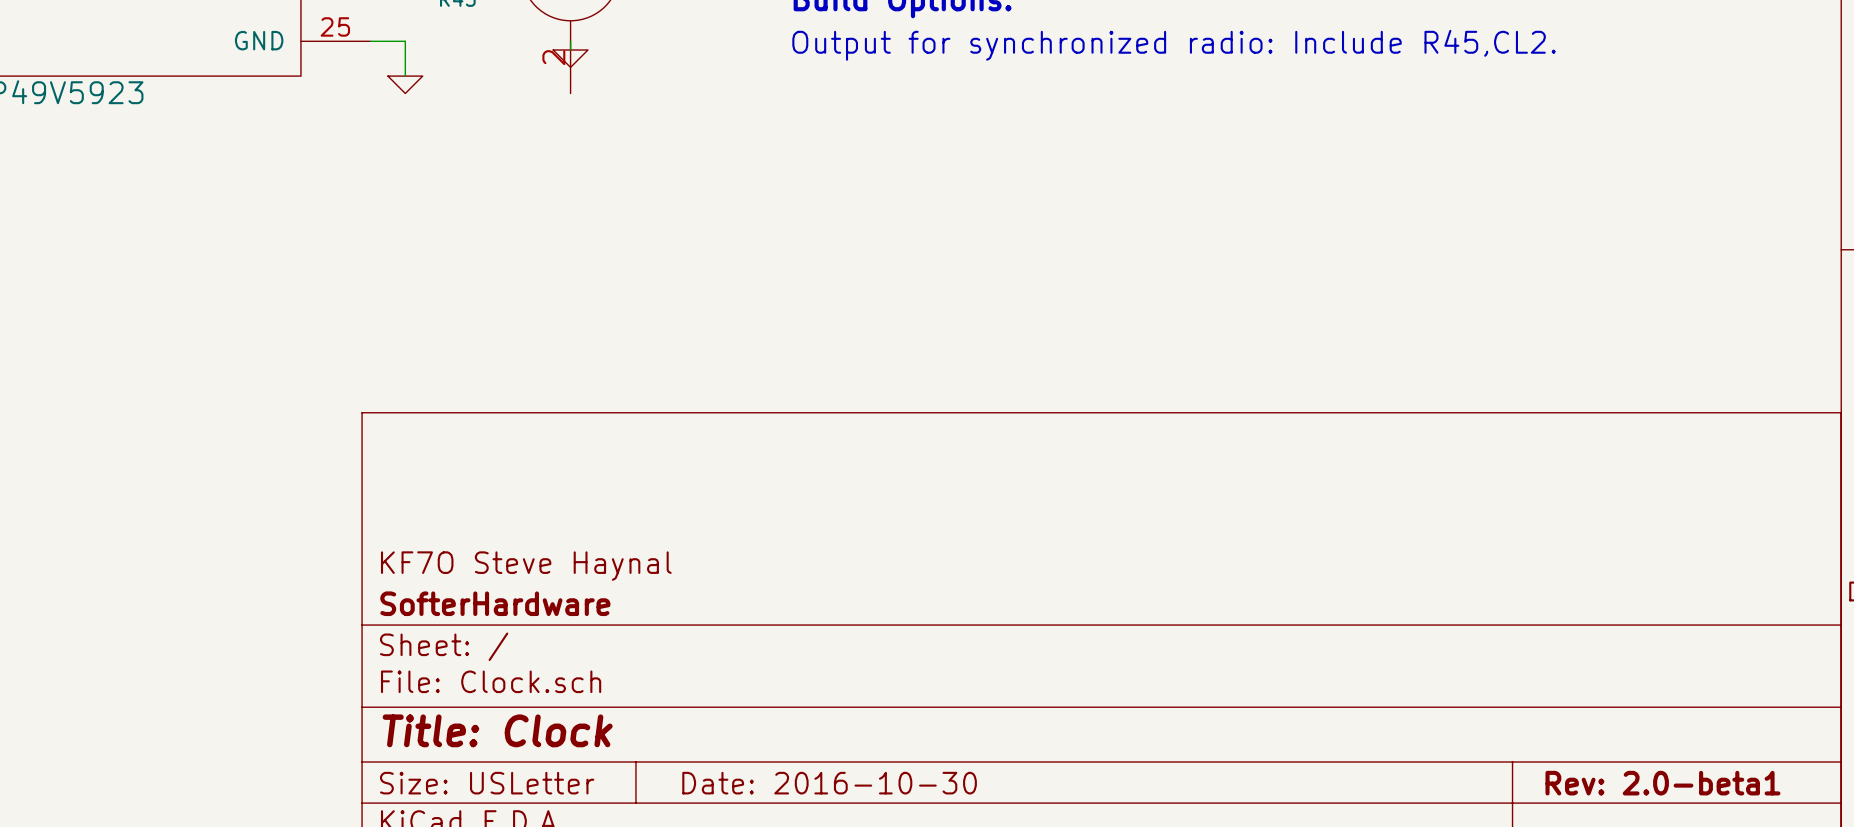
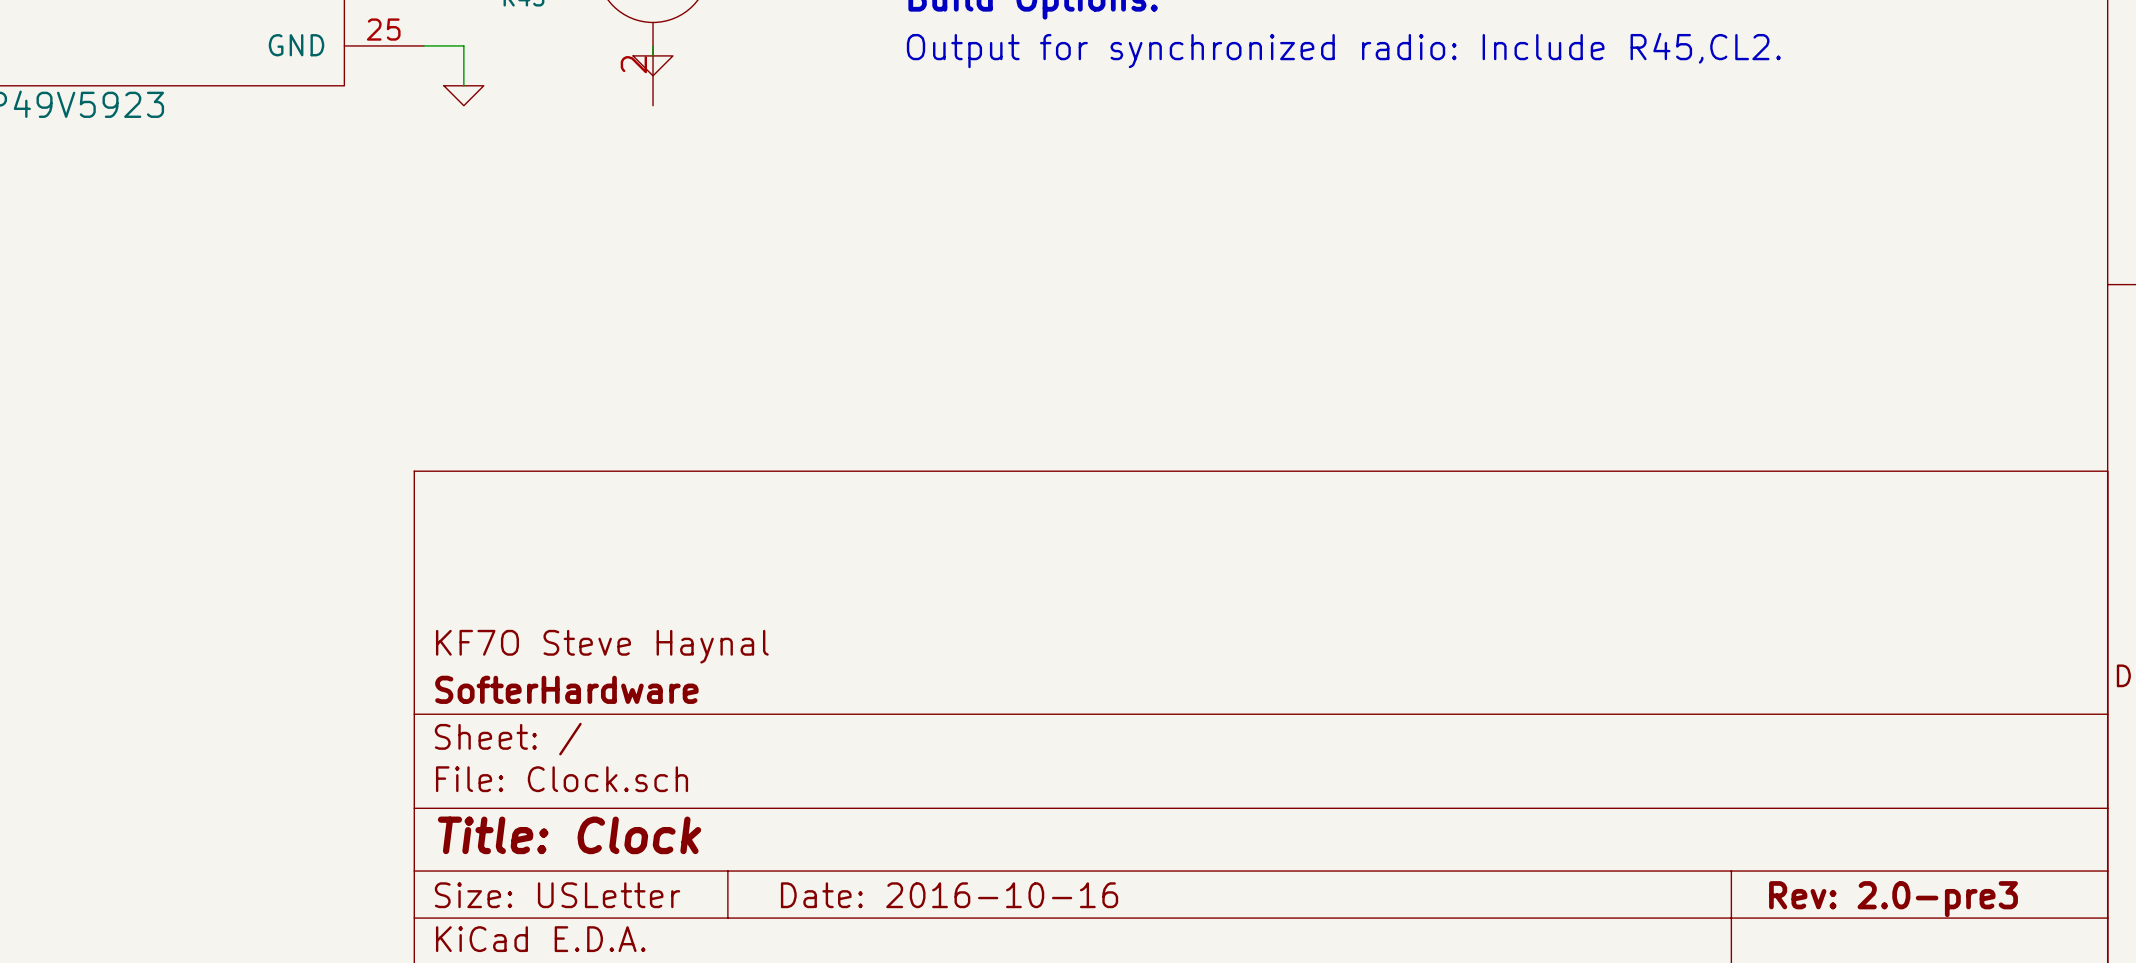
title block: Date: 2016-10-30 (829, 783) -> Date: 2016-10-16 (949, 895)
title block: Rev: 2.0-beta1 (1662, 783) -> Rev: 2.0-pre3 (1893, 899)

